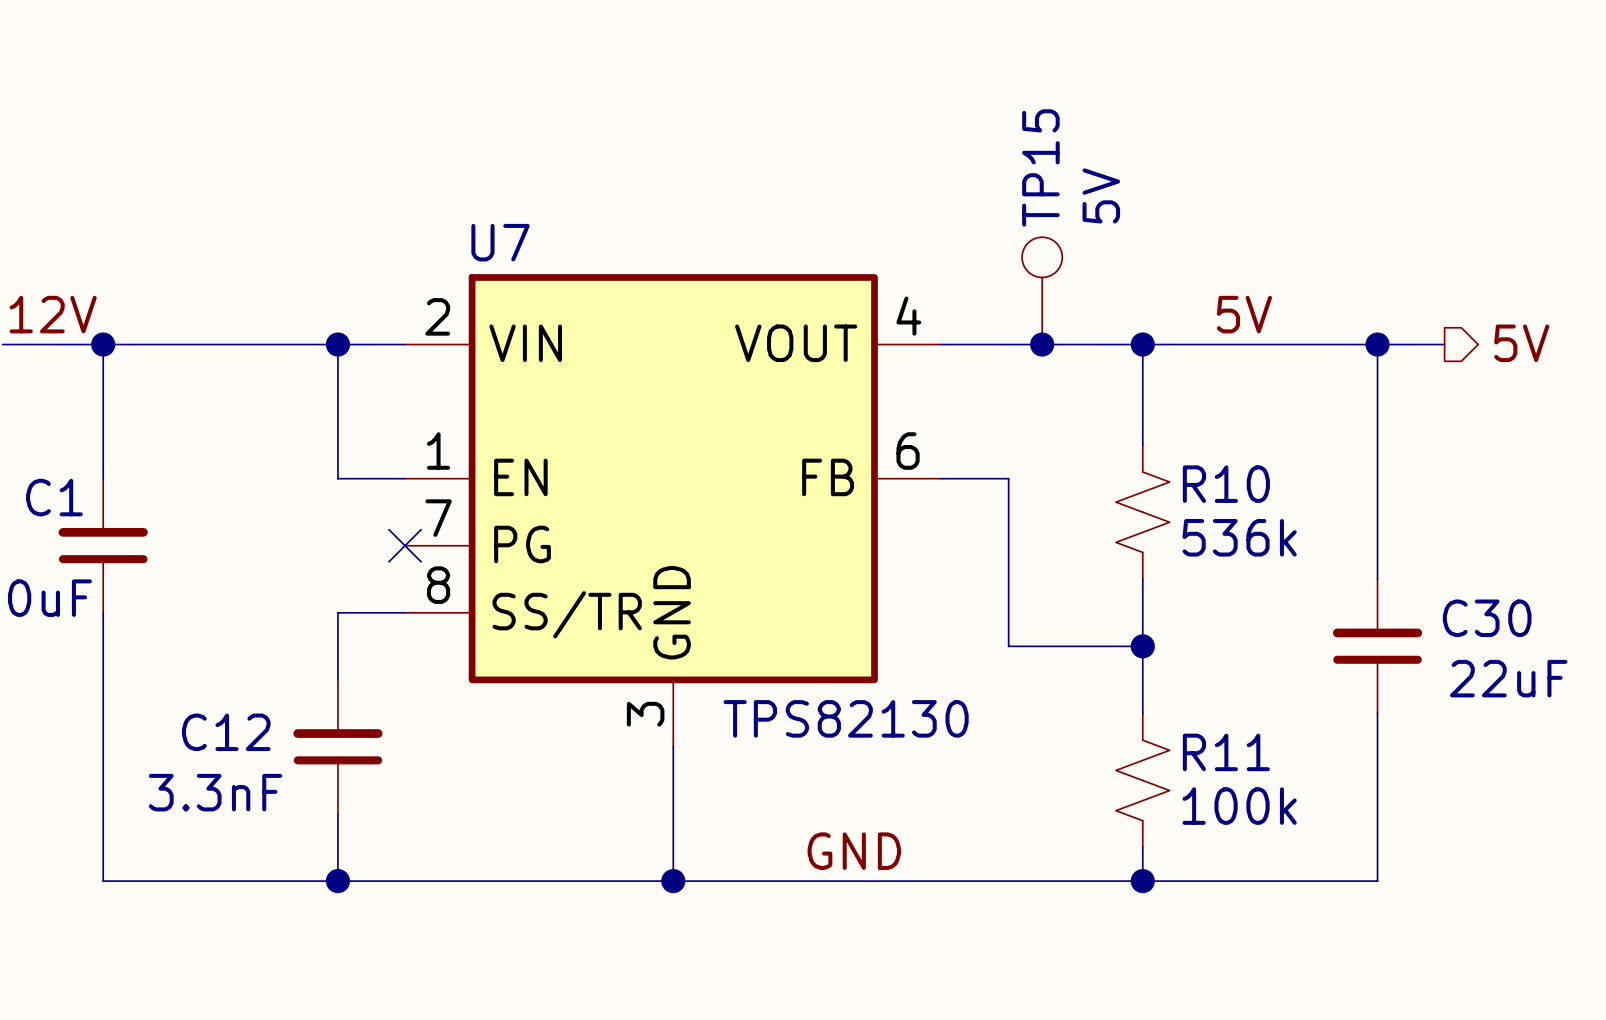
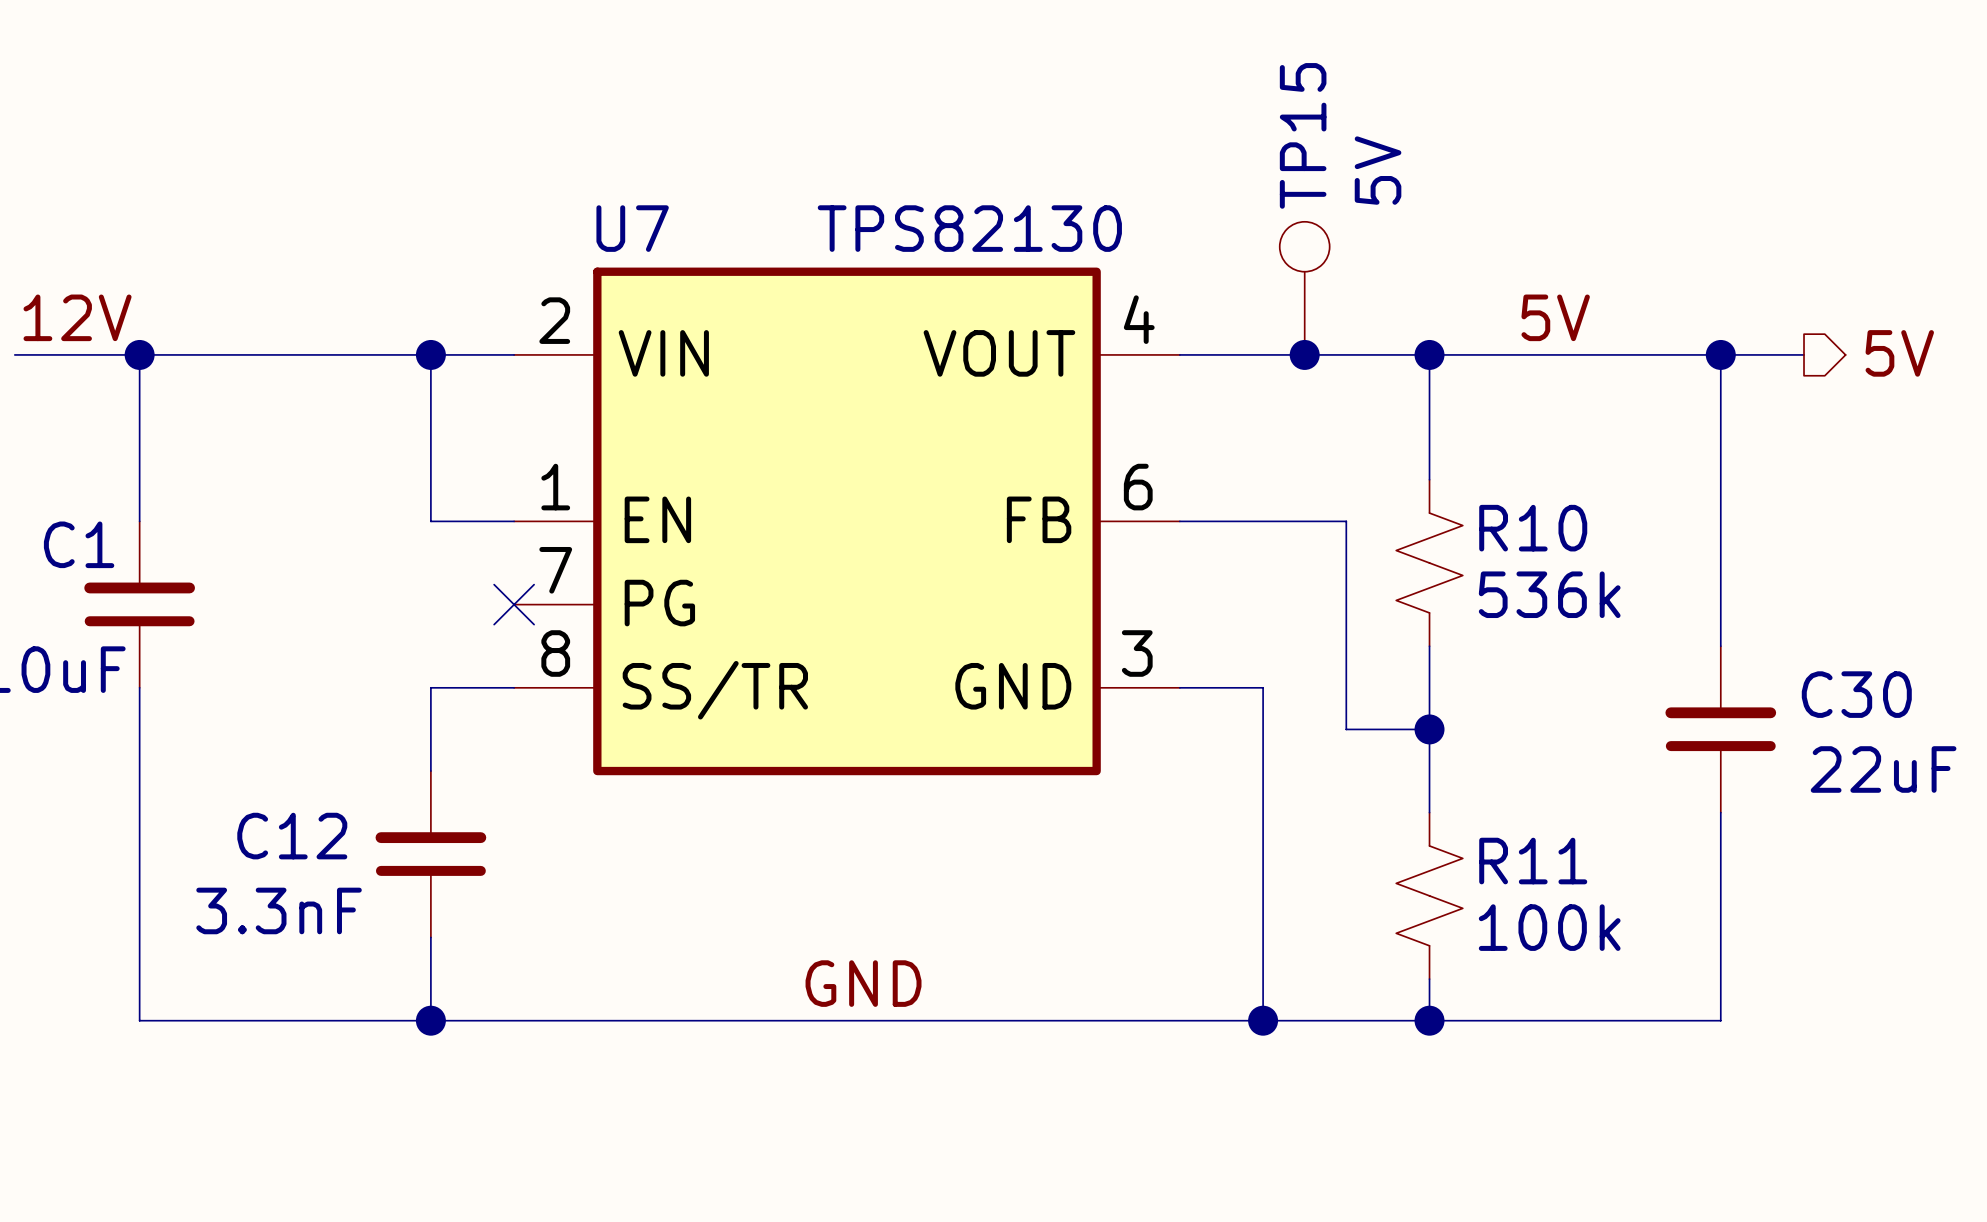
U7 symbol: [405, 274, 942, 747] -> [514, 267, 1180, 776]
wire: (1008, 478) (1008, 612) -> (1263, 521) (1346, 521) (1346, 729)
wire: none -> (1179, 687) (1263, 687)
wire: (1008, 646) (1075, 646) -> (1263, 729) (1263, 1020)
U7 value position: TPS82130 (846, 718) -> TPS82130 (969, 228)
wire: (673, 746) (673, 881) -> none
label position: GND (854, 851) -> GND (863, 983)
junction: (673, 881) -> none
junction: none -> (1263, 1020)

